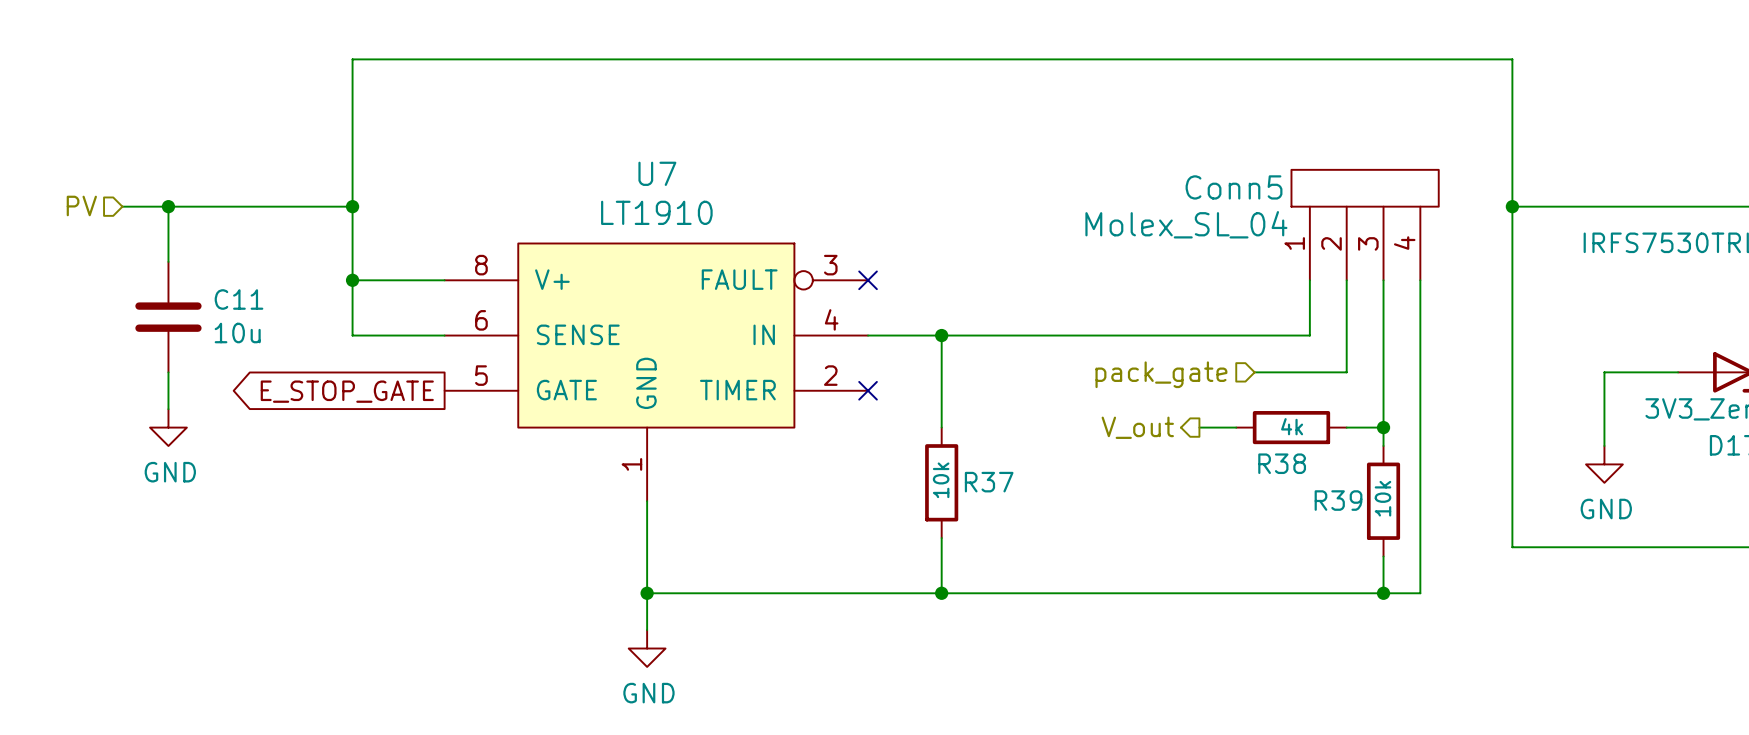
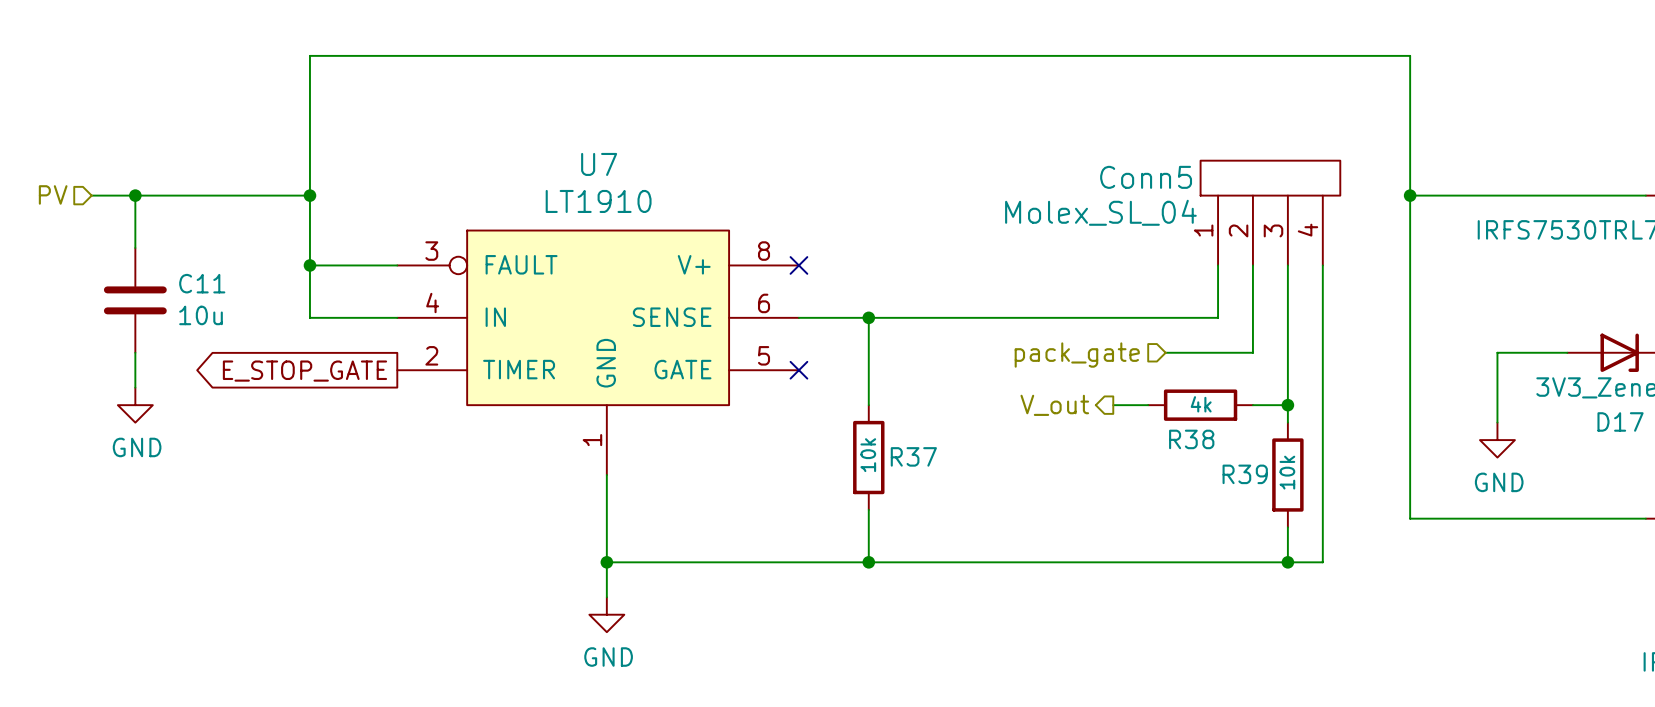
U7 flip: as is (656, 335) -> left-right (598, 317)
wire: (647, 501) (647, 630) -> (606, 475) (606, 597)
wire: (647, 593) (665, 593) -> none
junction position: (647, 593) -> (606, 562)
power symbol position: GND (647, 648) -> GND (606, 614)

